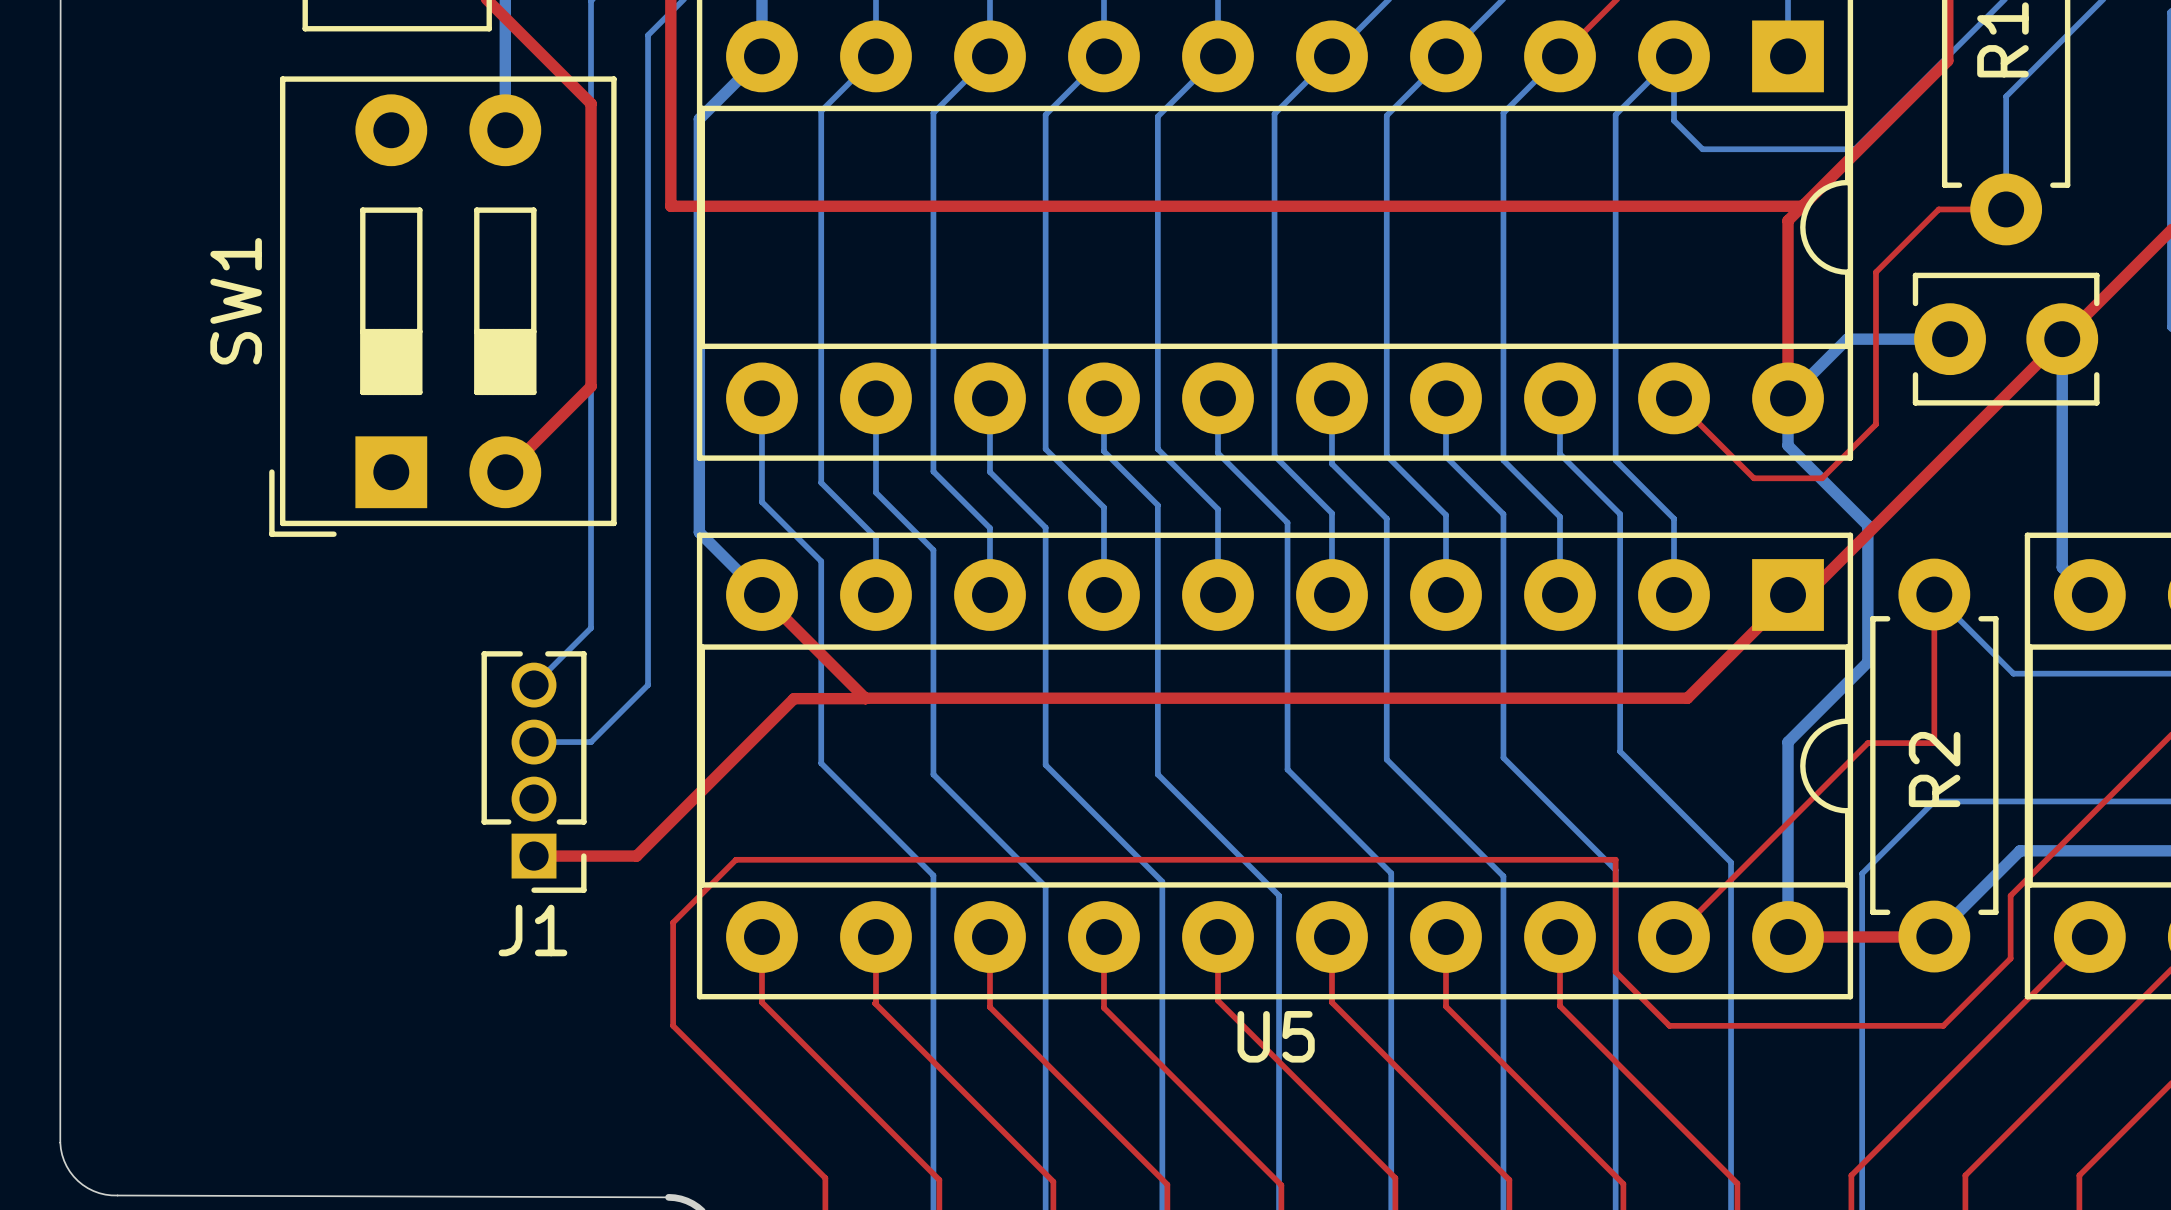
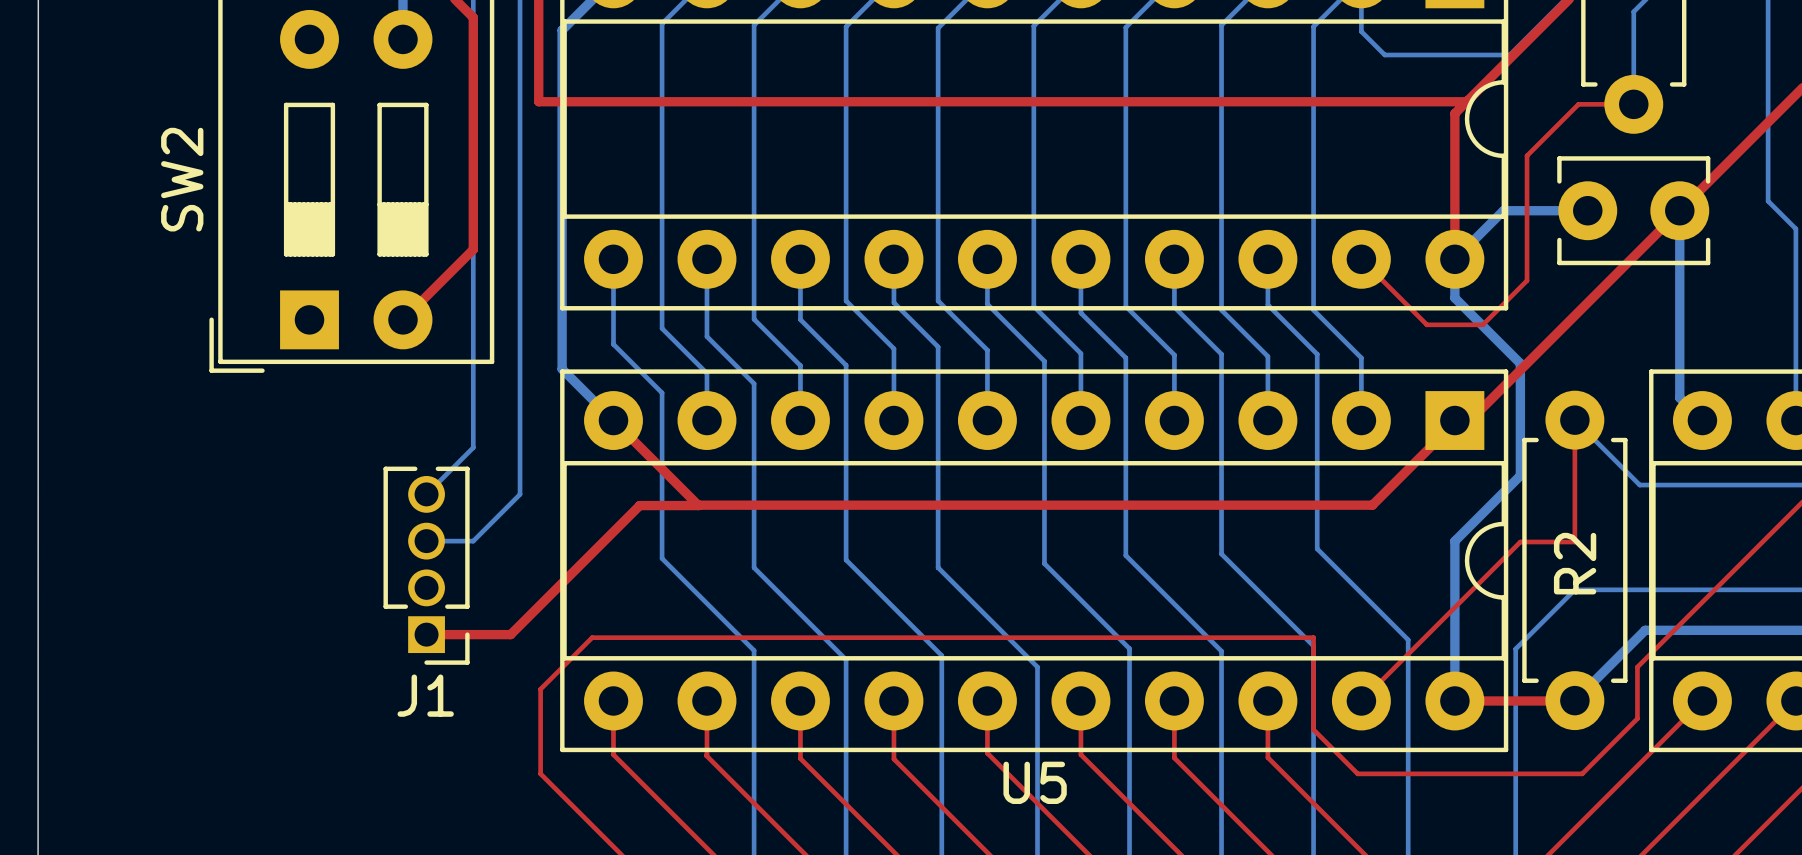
SW1 name: SW1 (236, 301) -> SW2 (182, 179)

